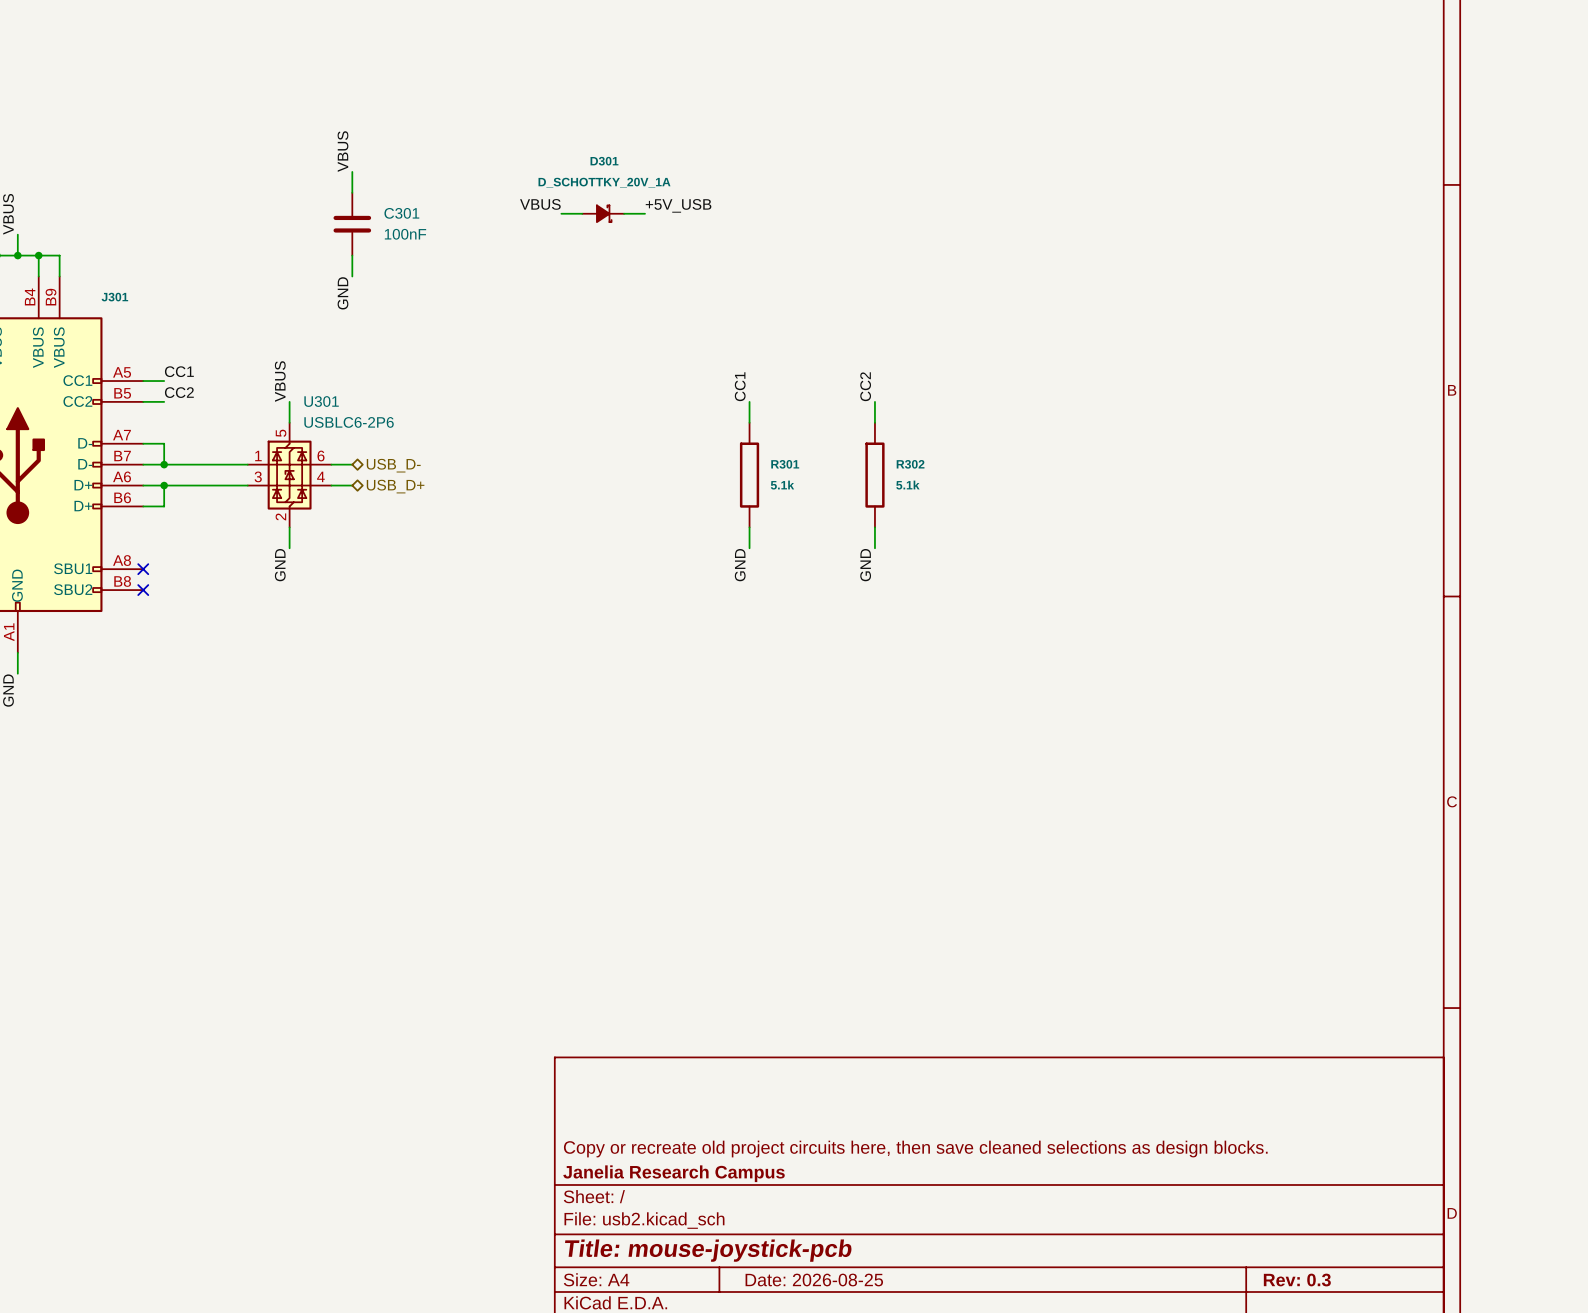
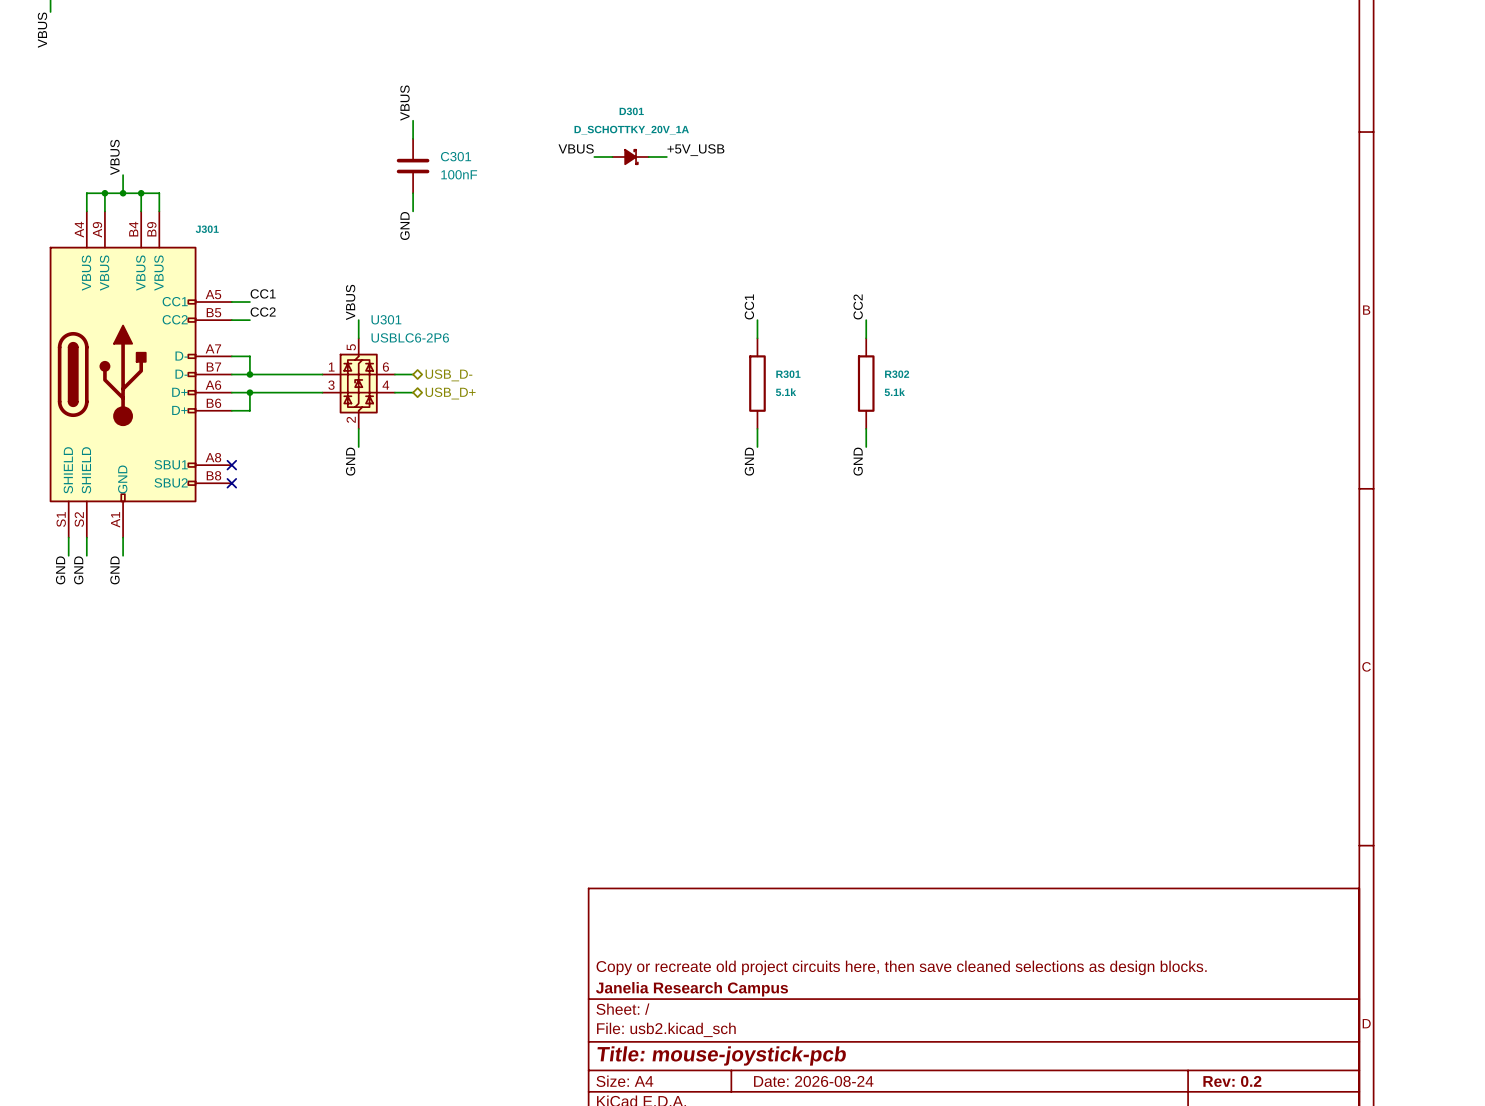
title block: Date: 2026-08-25 (814, 1280) -> Date: 2026-08-24 (813, 1081)
title block: Rev: 0.3 (1297, 1280) -> Rev: 0.2 (1232, 1081)

